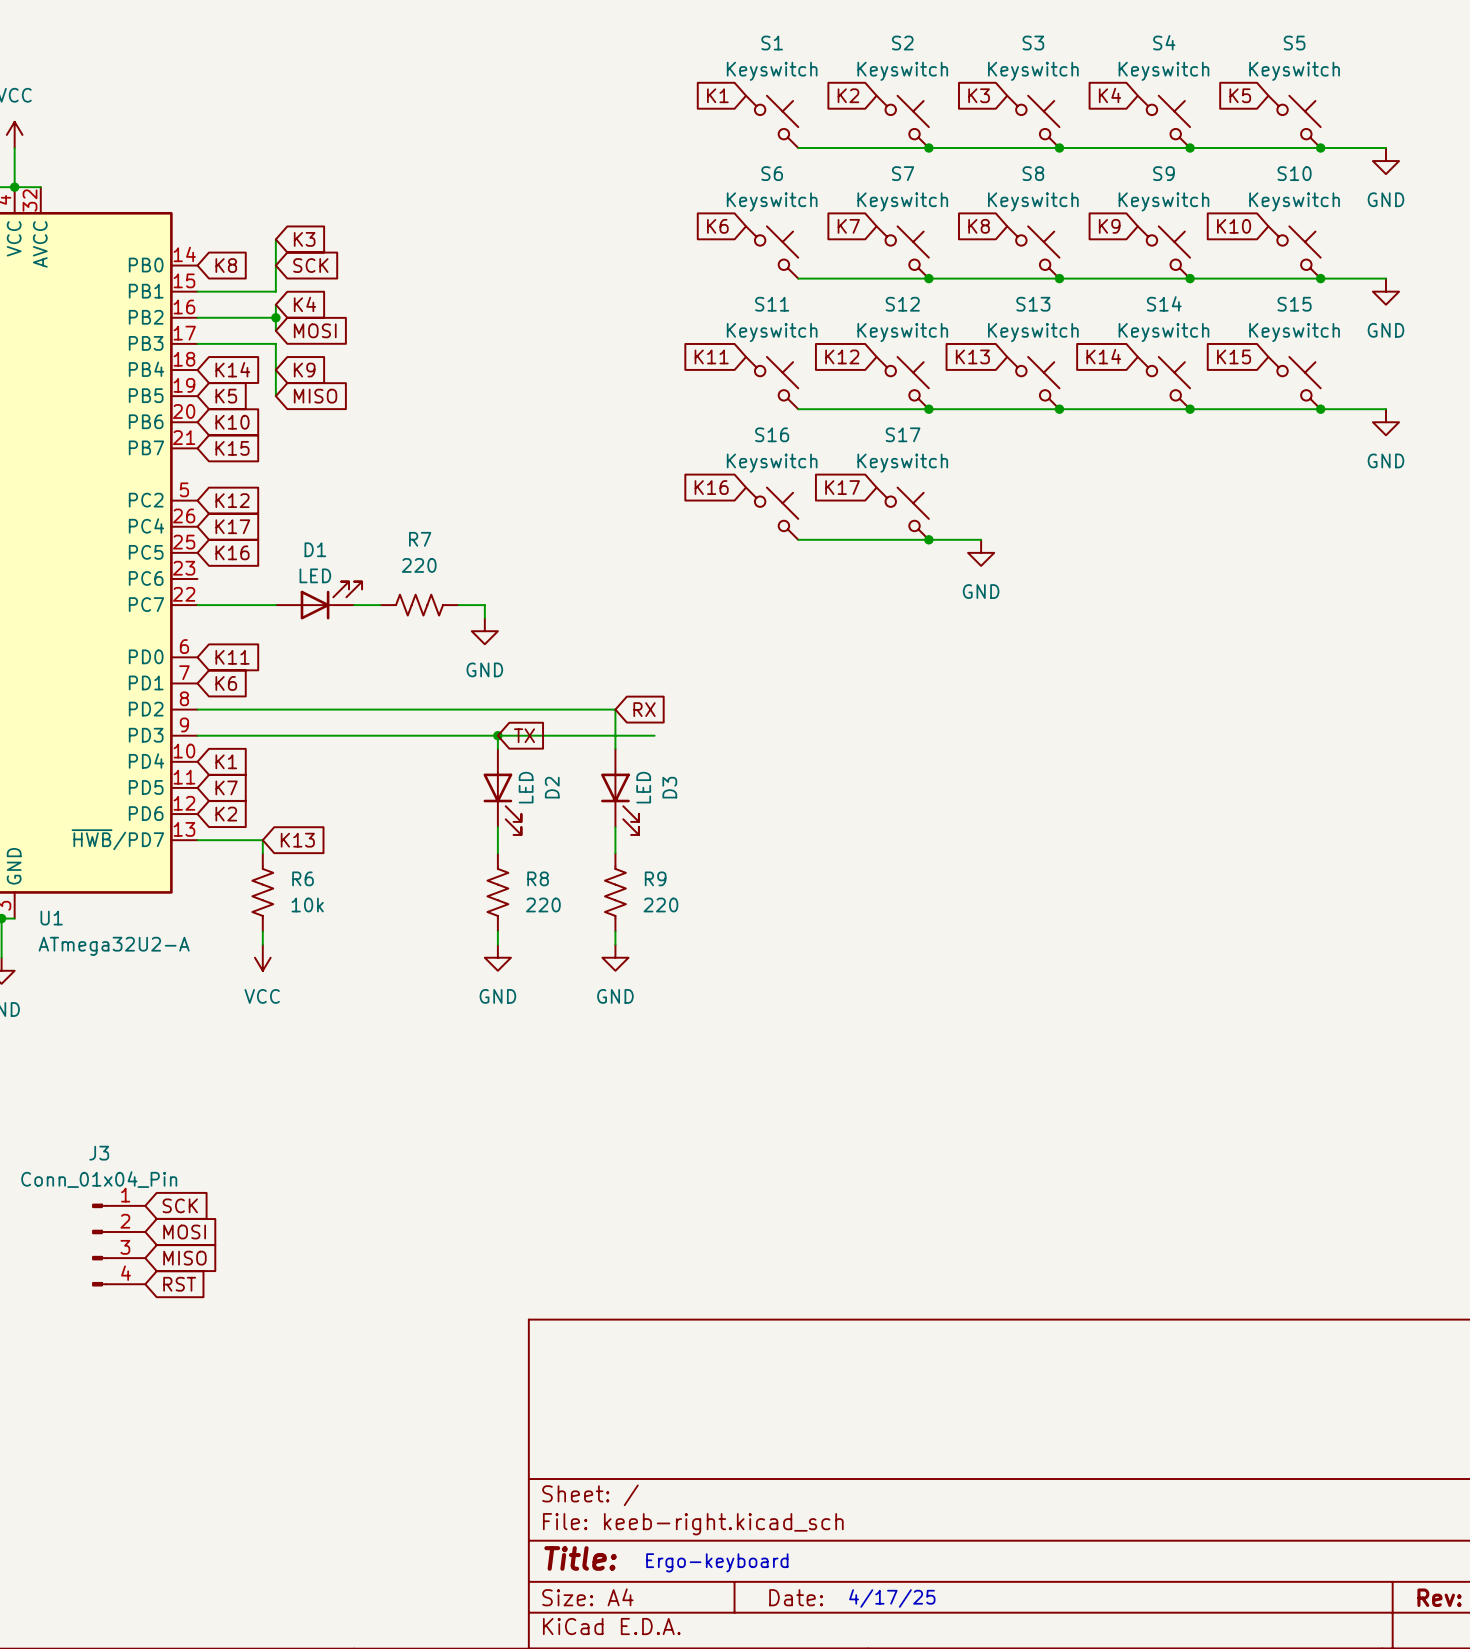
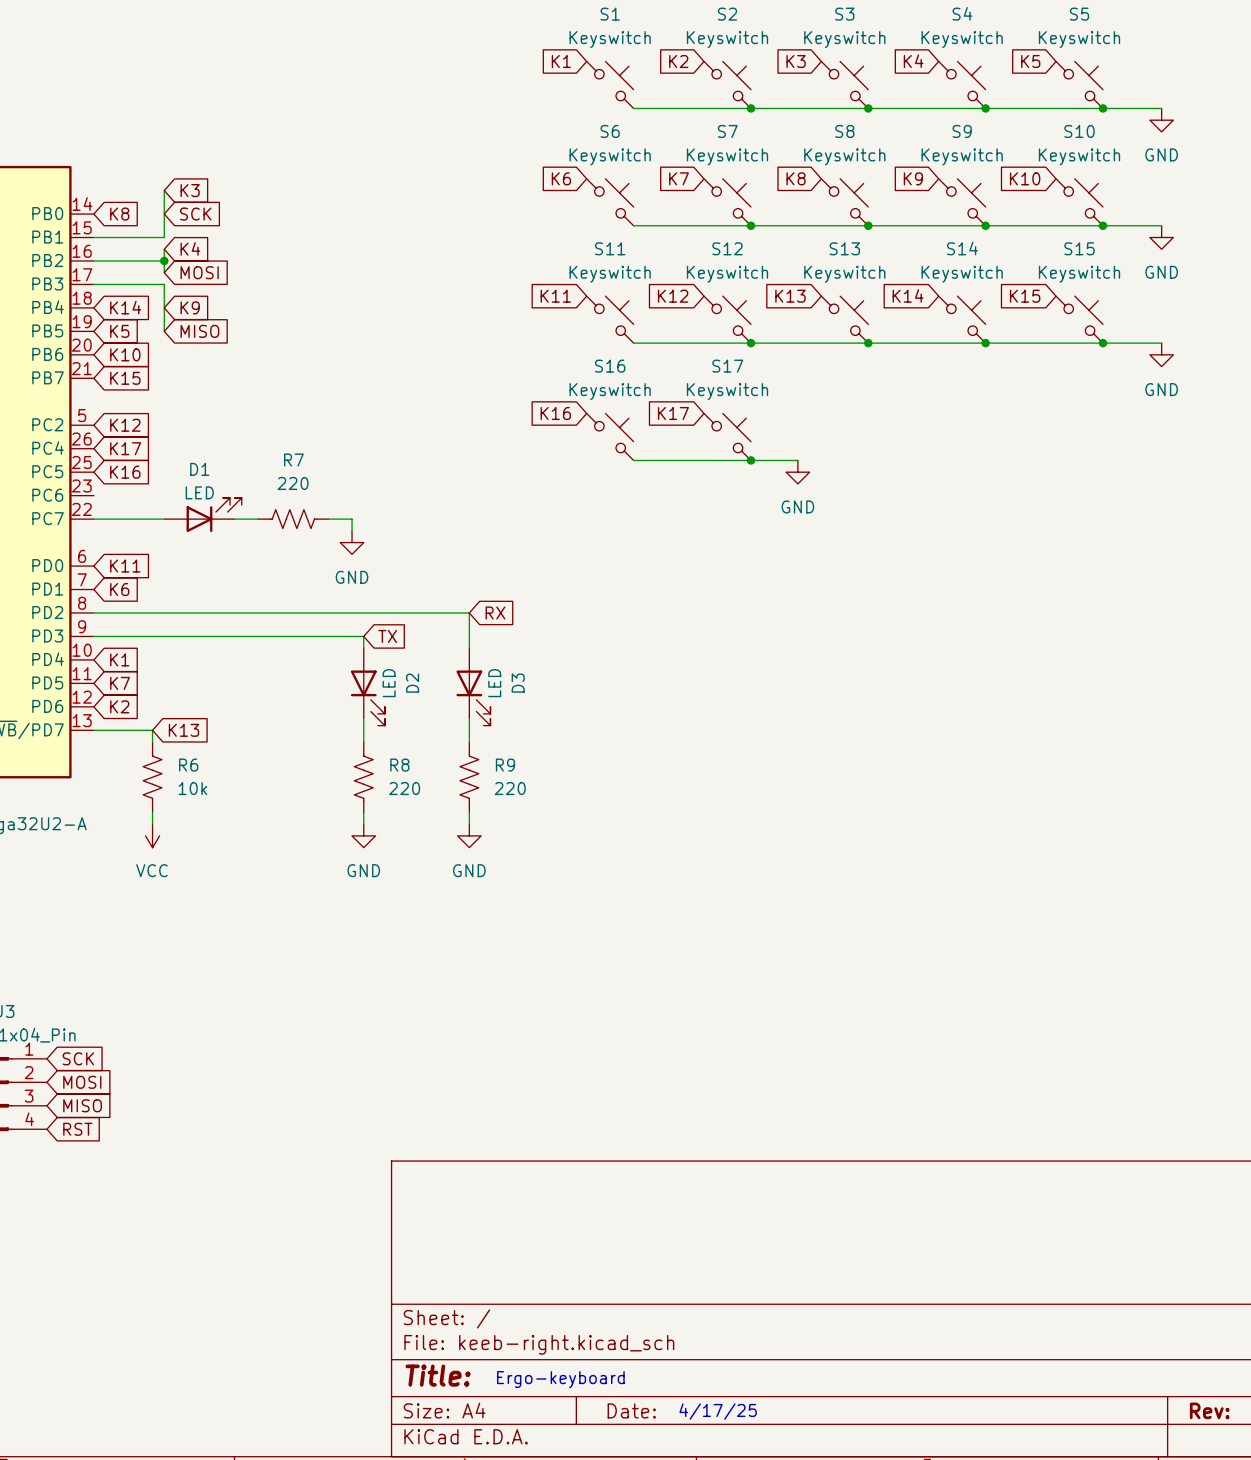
wire: (497, 735) (654, 735) -> none
junction: (497, 735) -> none

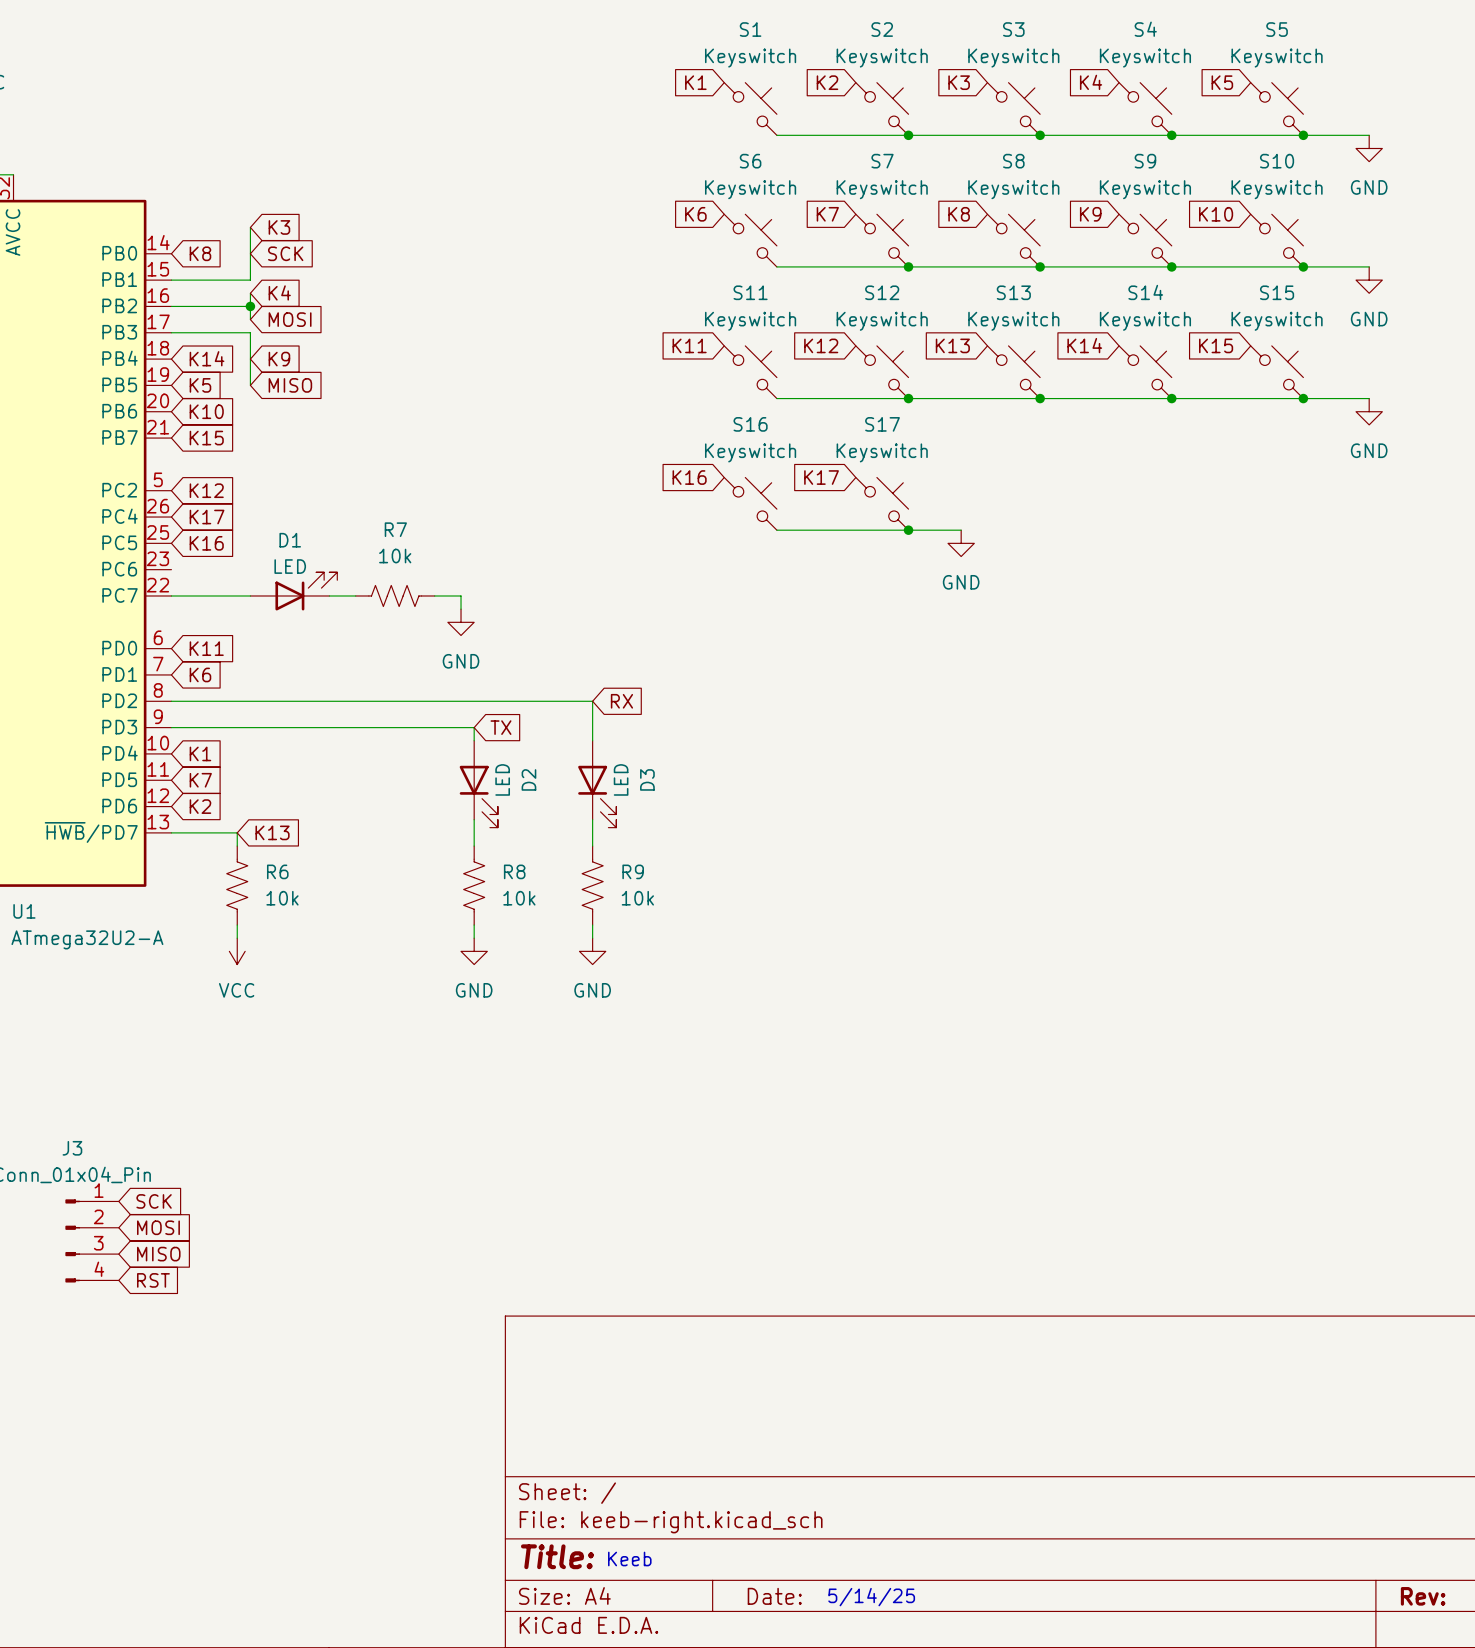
R7 value: 220 (293, 483) -> 10k (395, 556)
R8 value: 220 (404, 788) -> 10k (519, 898)
R9 value: 220 (510, 788) -> 10k (637, 898)
text: none -> Keeb (629, 1559)
text: Ergo-keyboard (560, 1379) -> none
text: 4/17/25 (718, 1411) -> 5/14/25 (871, 1597)

